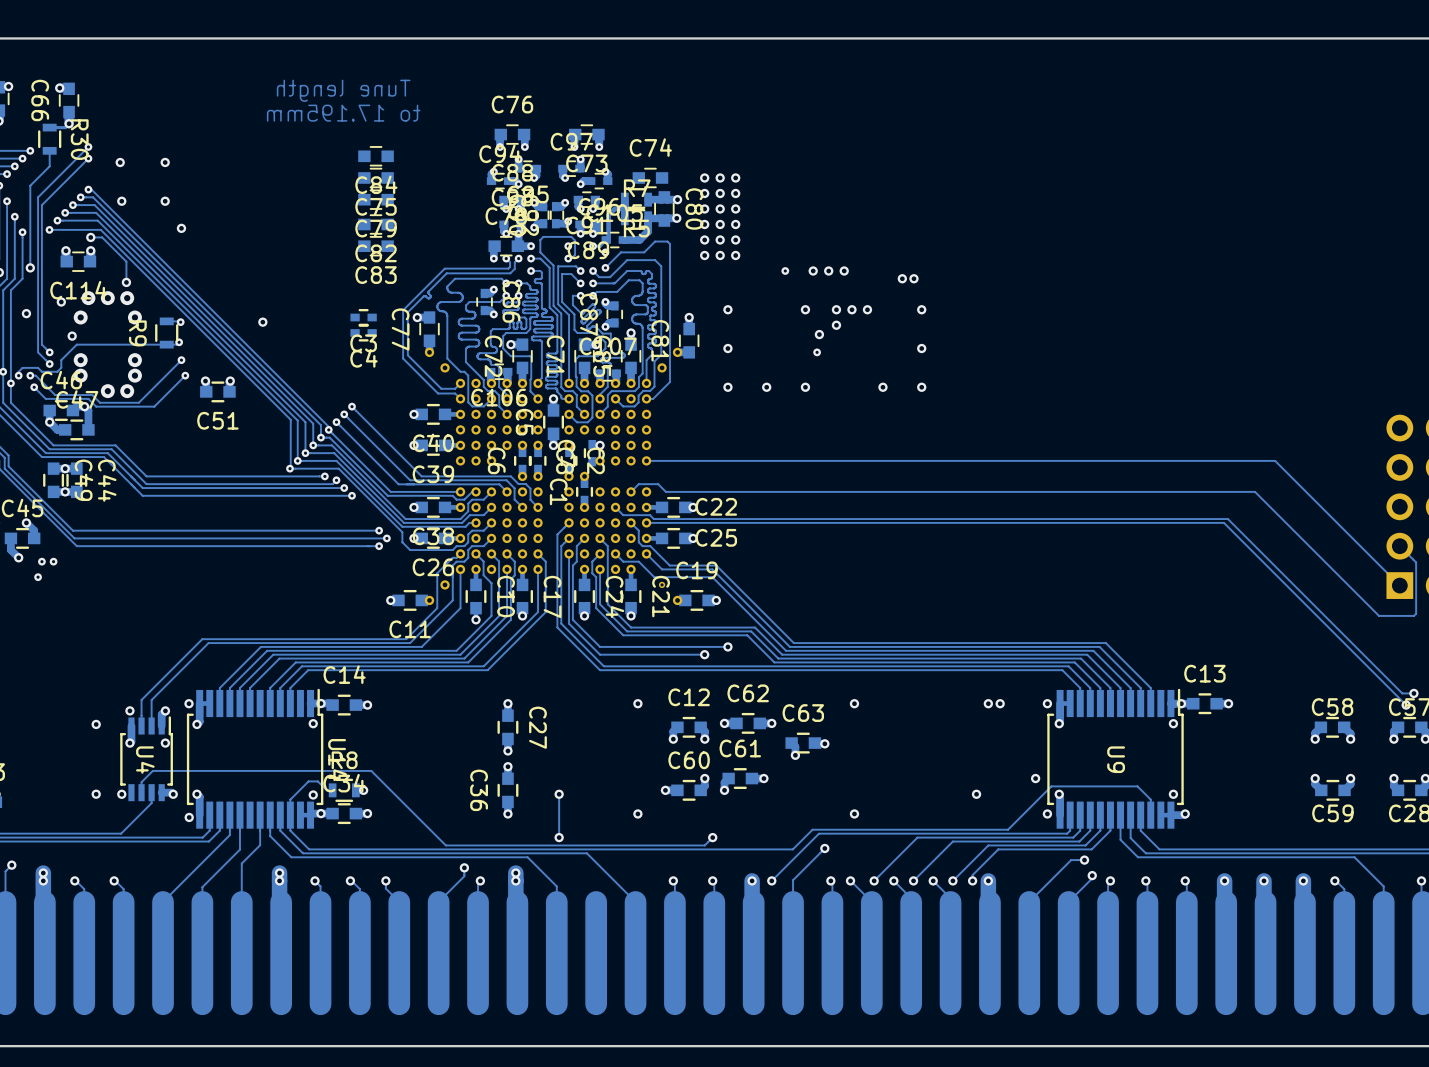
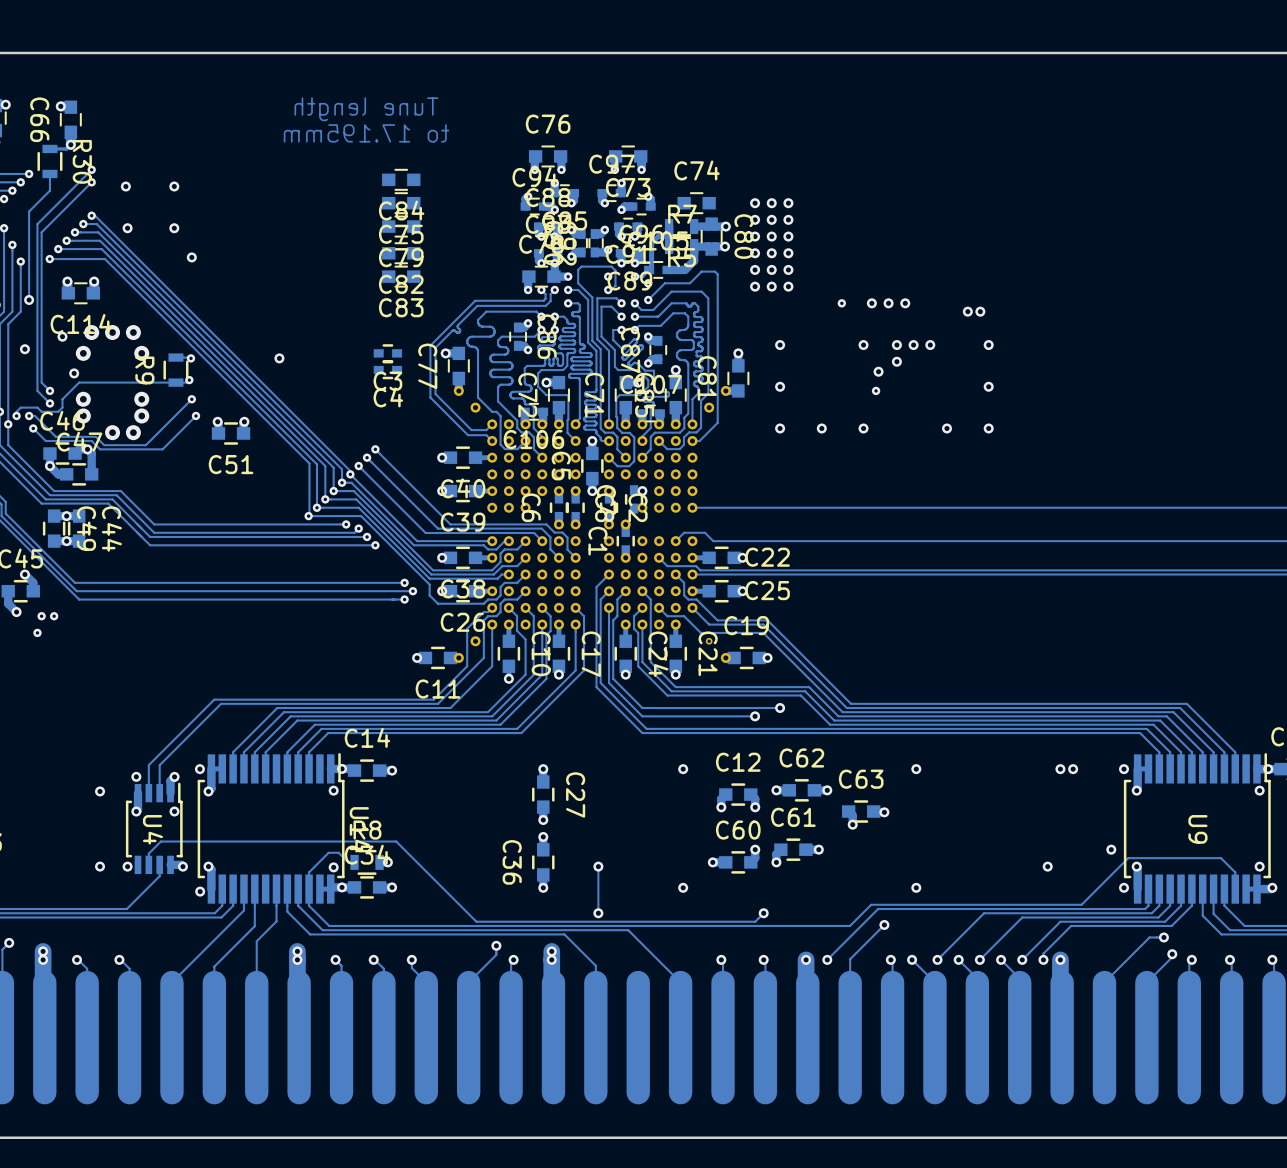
track: (90, 237) (102, 237) (126, 261) (126, 282) -> none
via: (90, 237) -> none
via: (126, 282) -> none

